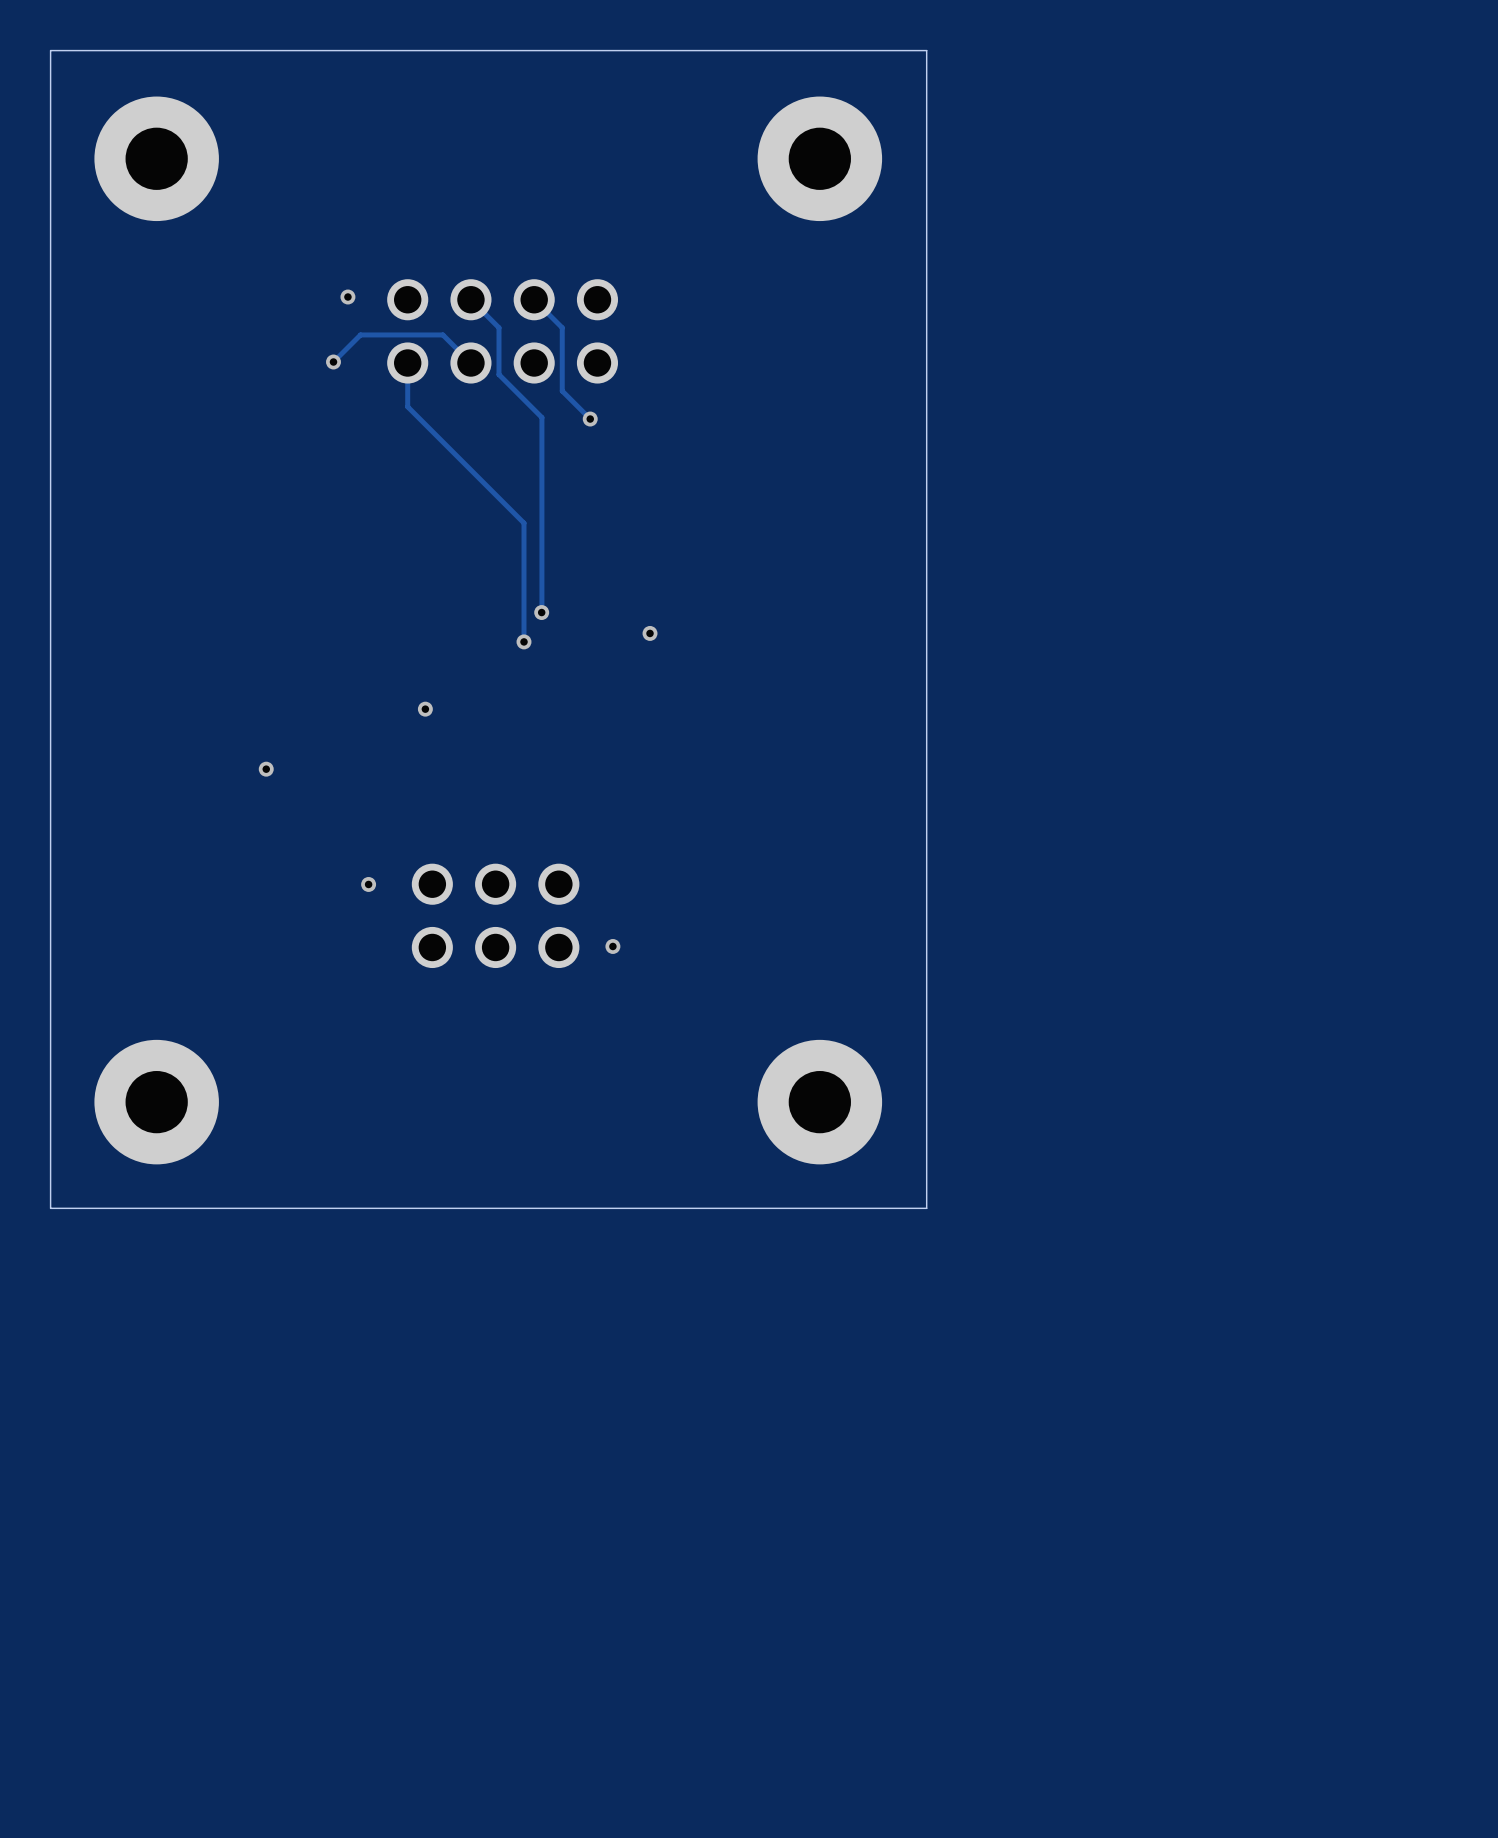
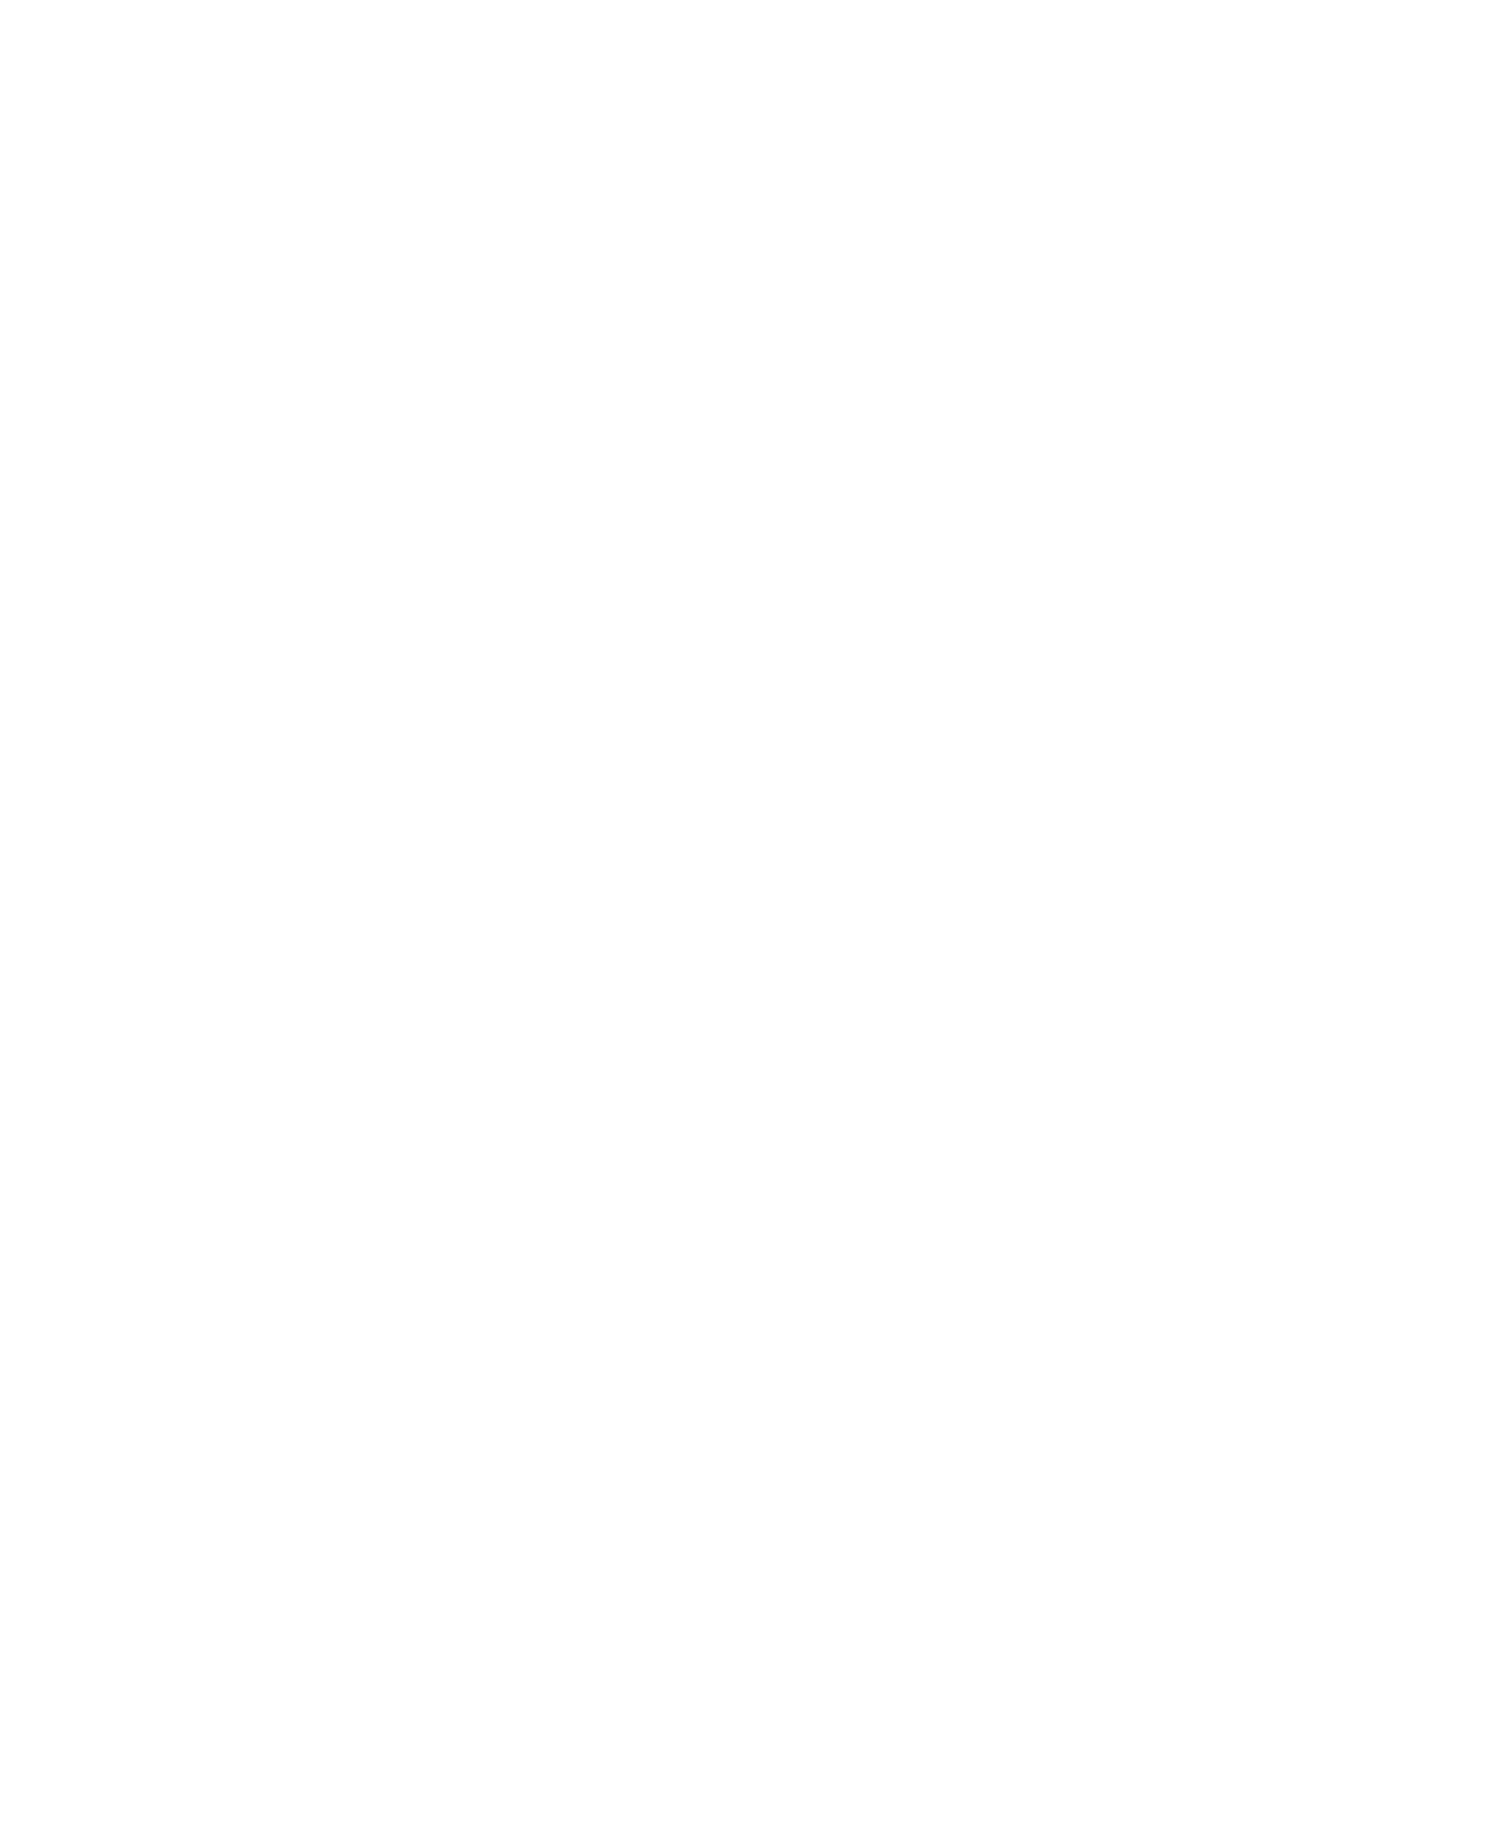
board edge: (926, 50) (50, 50) (50, 1208) (926, 1208) (926, 50) -> none
part: (156, 158) -> none
part: (819, 158) -> none
via: (347, 297) -> none
track: (470, 299) (499, 327) (499, 374) (541, 417) (541, 612) -> none
track: (534, 299) (562, 327) (562, 391) (590, 419) -> none
part: (502, 331) -> none
track: (333, 362) (360, 334) (442, 334) (470, 363) -> none
via: (333, 362) -> none
track: (407, 363) (407, 406) (524, 523) (524, 641) -> none
via: (590, 419) -> none
via: (541, 612) -> none
via: (650, 633) -> none
via: (524, 641) -> none
via: (425, 709) -> none
via: (266, 769) -> none
via: (368, 884) -> none
part: (495, 915) -> none
via: (612, 946) -> none
part: (156, 1102) -> none
part: (819, 1102) -> none

